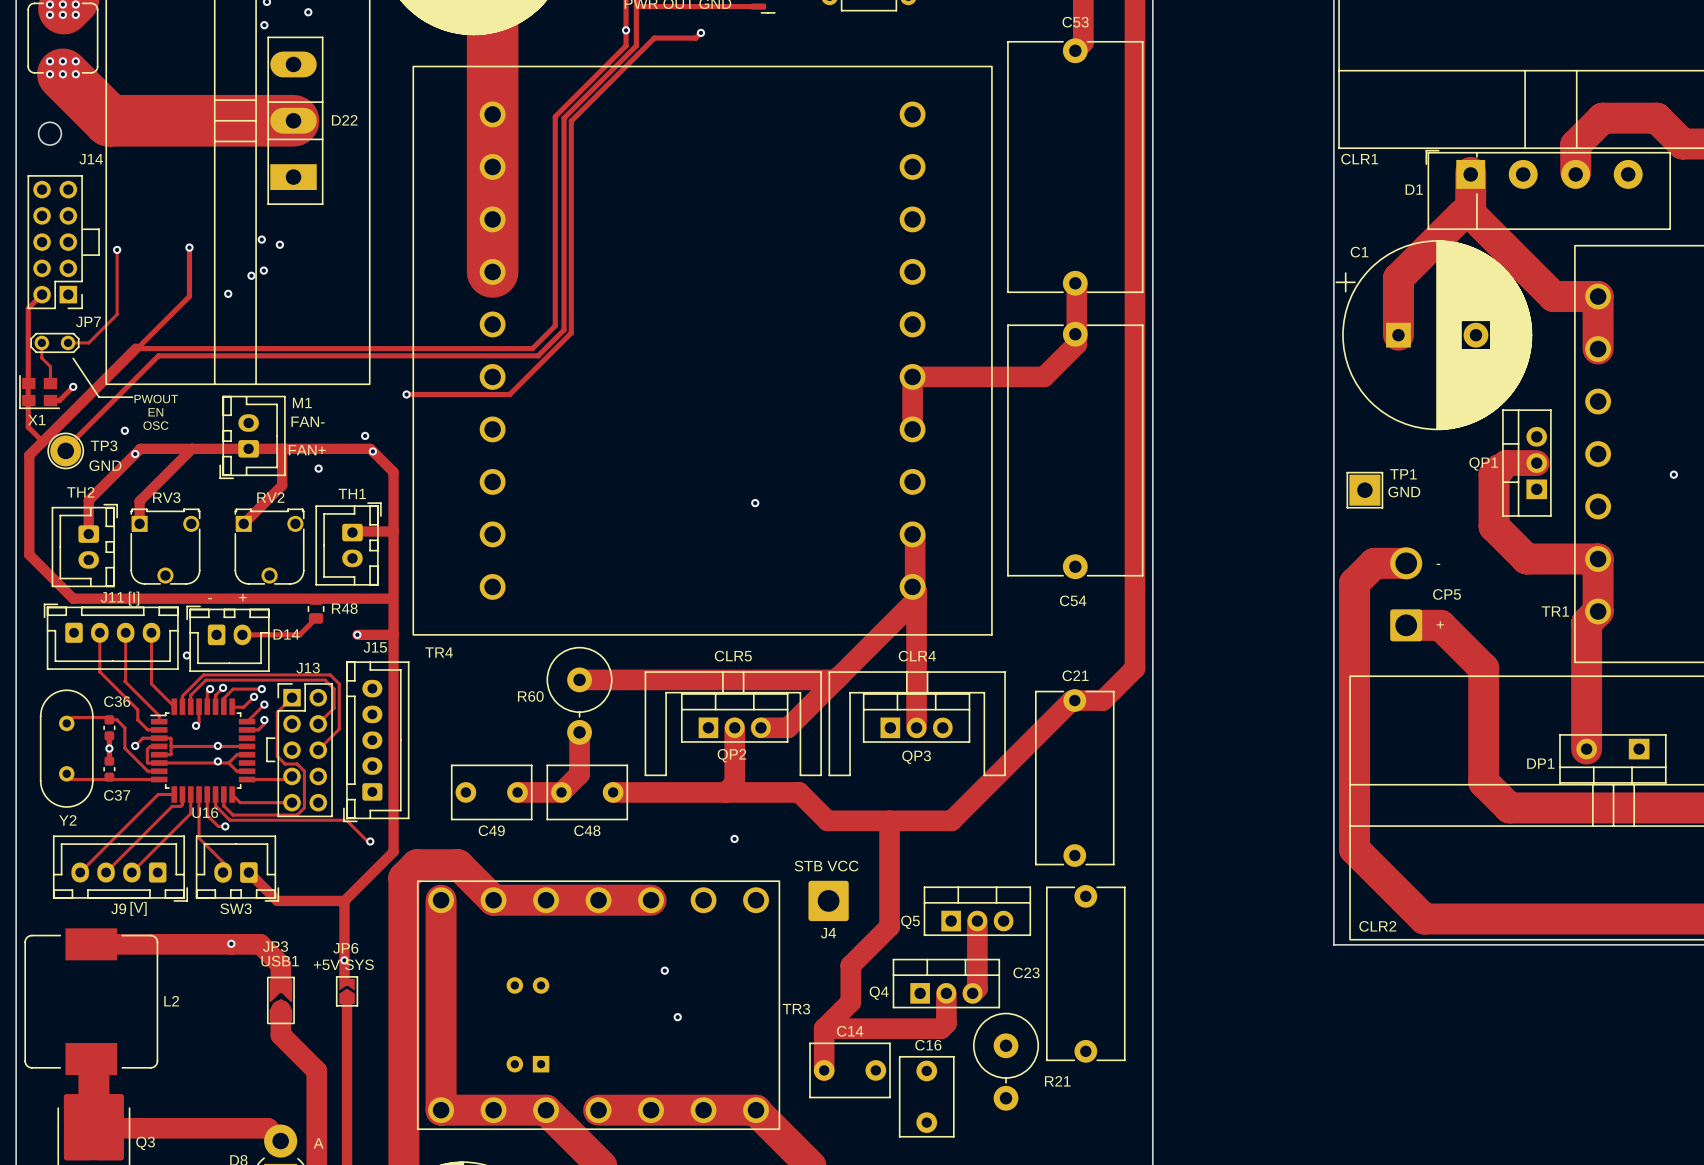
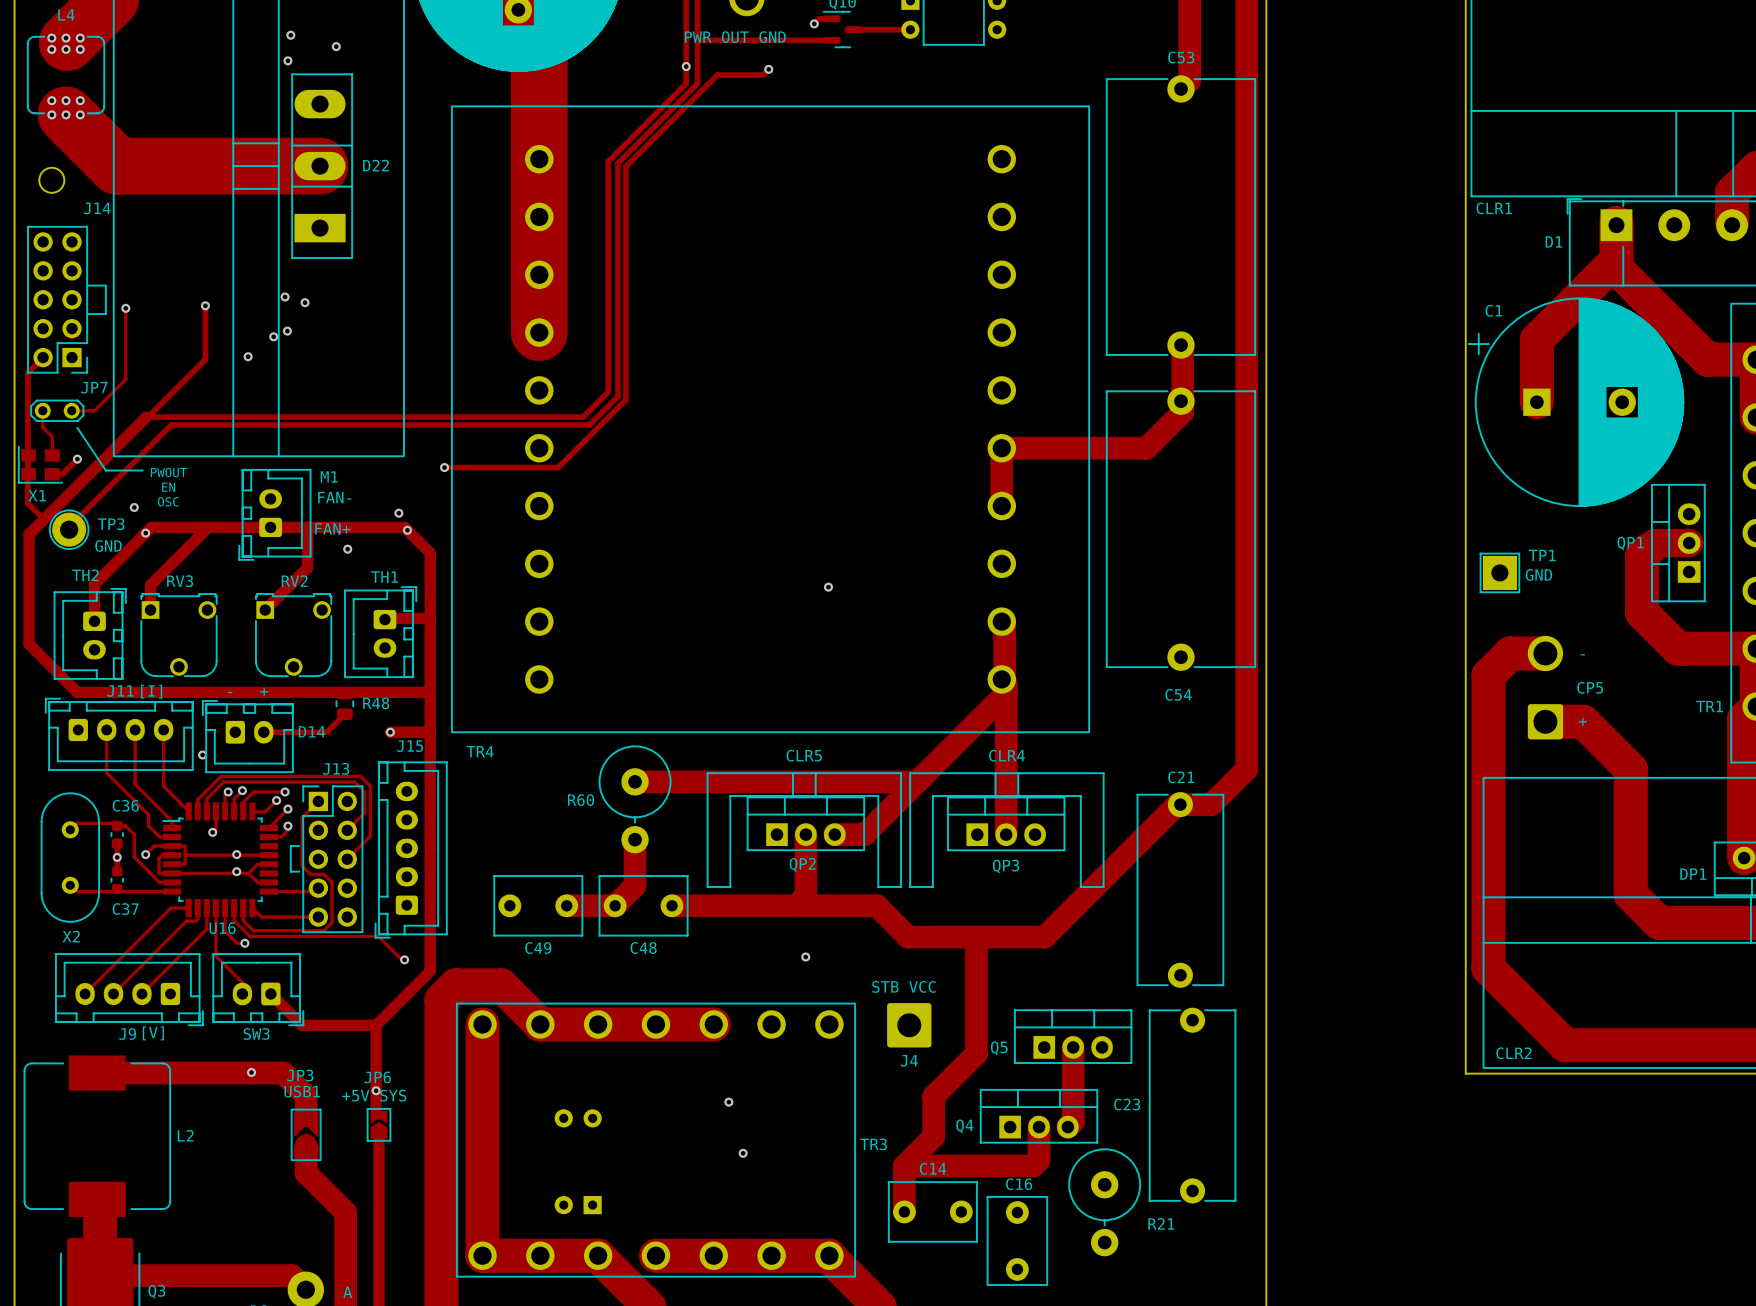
Y2 name: Y2 (67, 820) -> X2 (71, 936)

